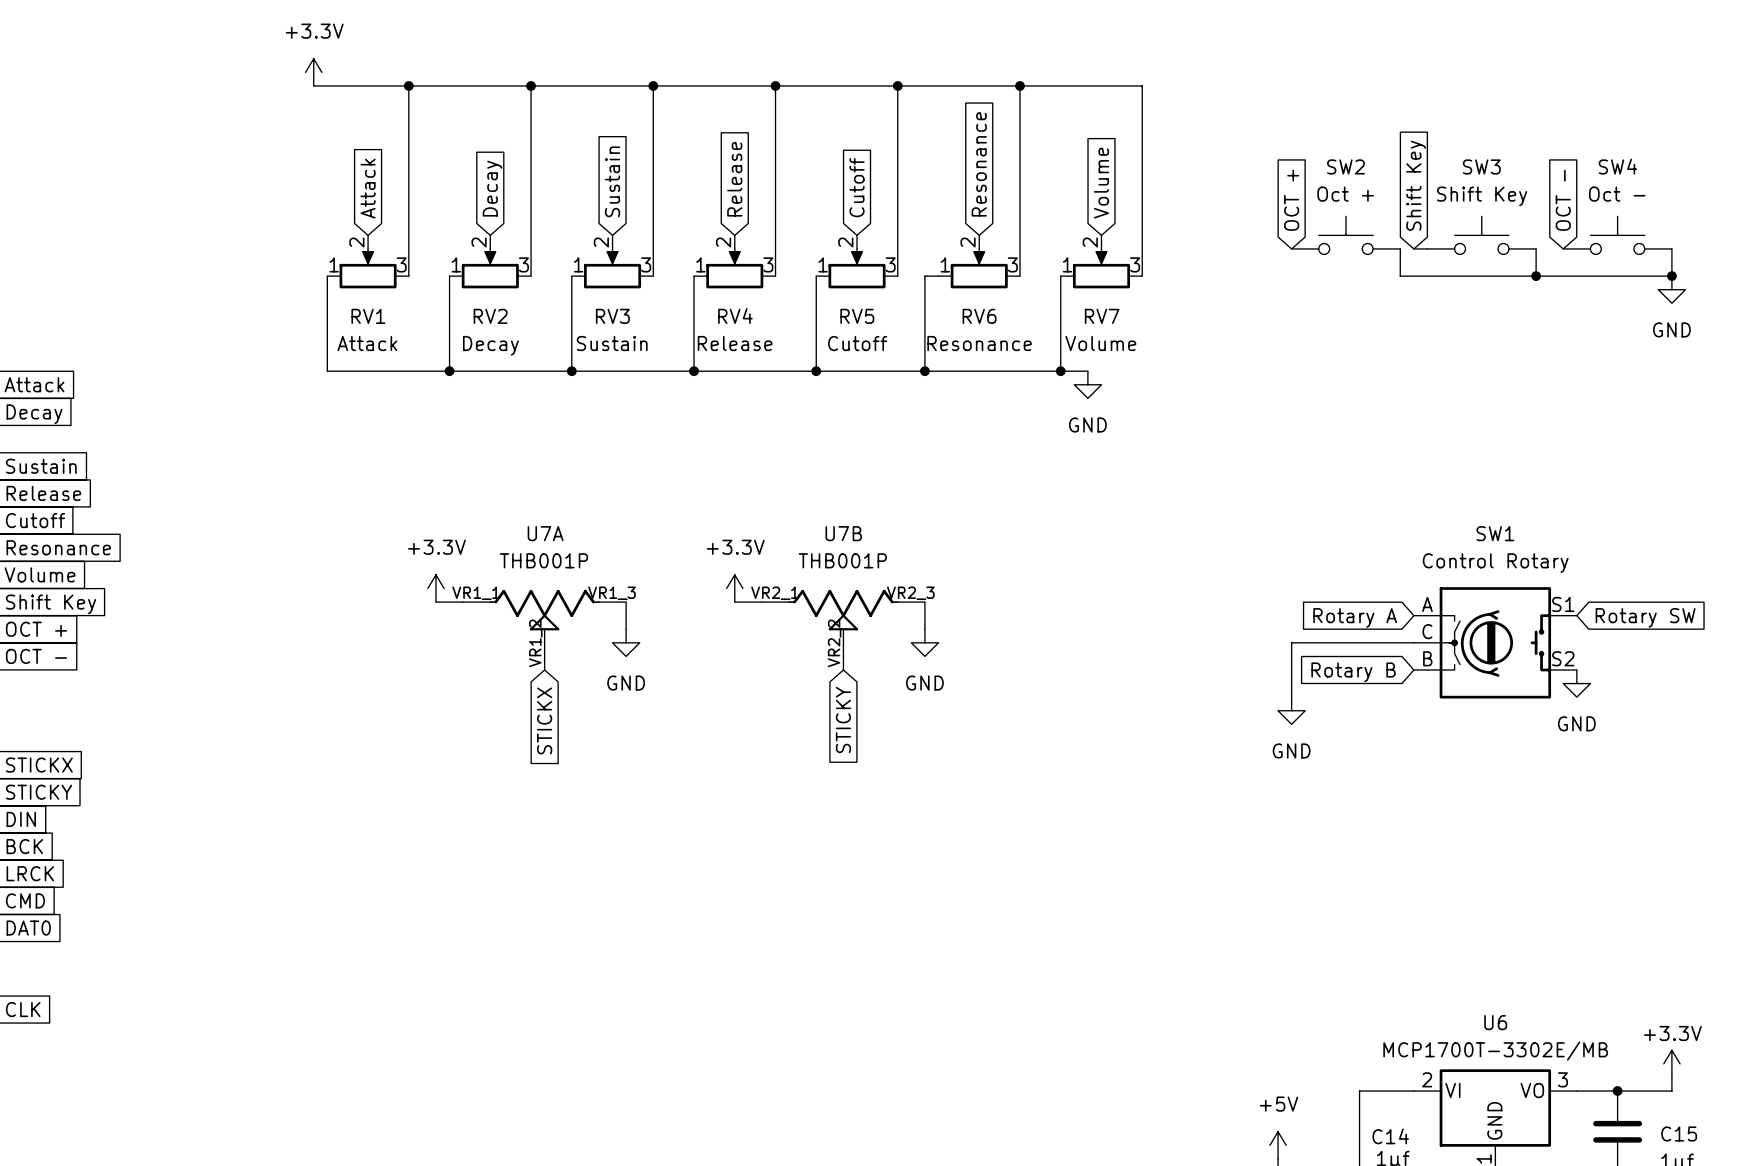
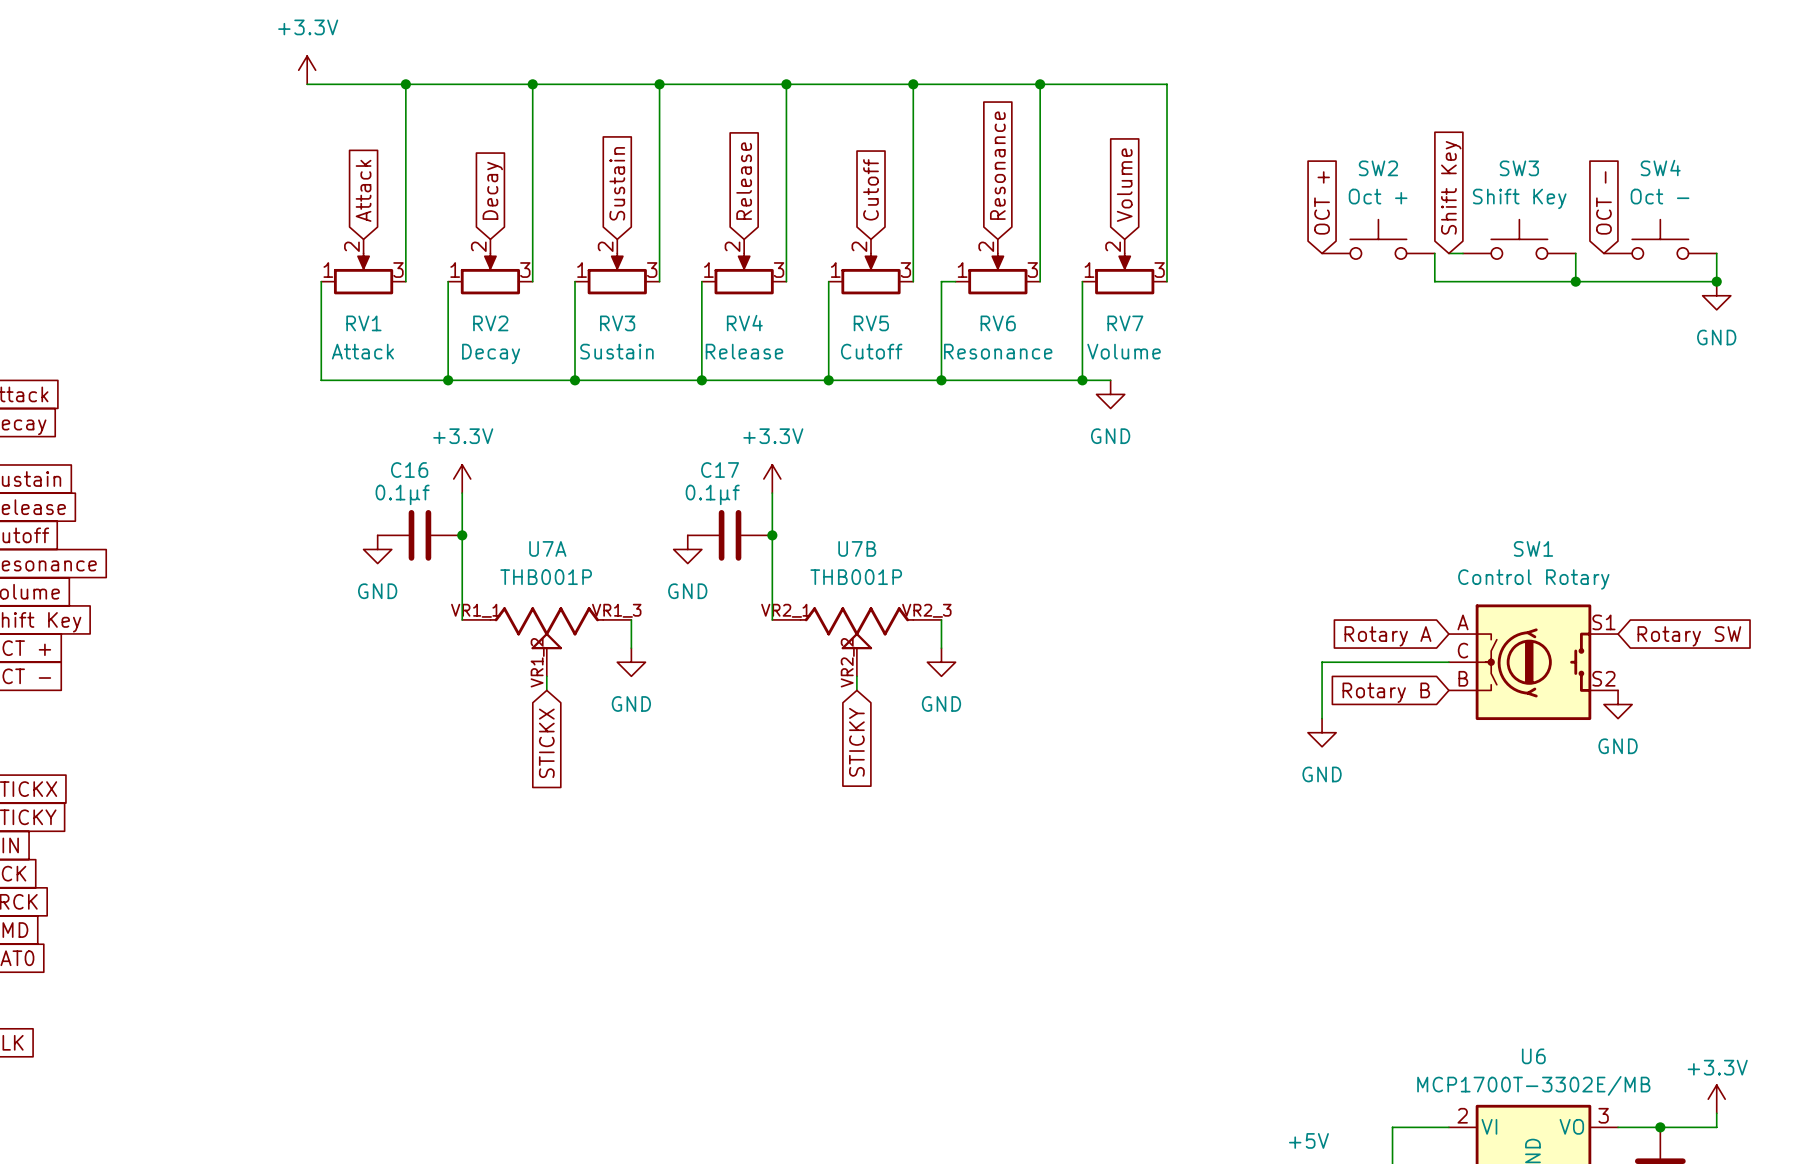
C16: none -> 0.1µf (419, 535)
junction: none -> (462, 535)
C17: none -> 0.1µf (730, 535)
junction: none -> (772, 535)
power symbol: none -> GND (377, 549)
power symbol: none -> GND (687, 549)
power symbol position: +3.3V (435, 588) -> +3.3V (462, 478)
power symbol position: +3.3V (734, 588) -> +3.3V (772, 478)
wire: (435, 602) (463, 602) -> (462, 493) (462, 619)
wire: (734, 602) (761, 602) -> (772, 493) (772, 619)

